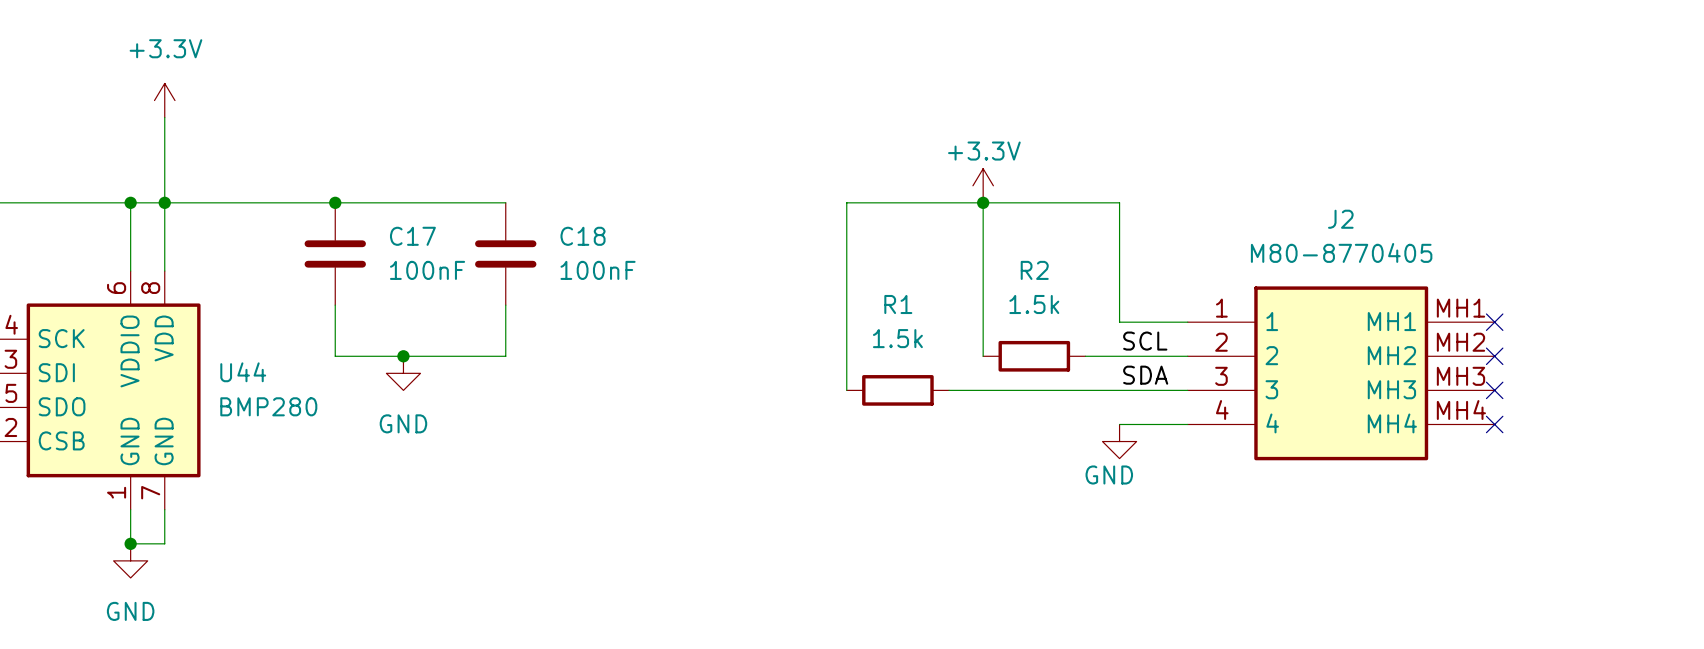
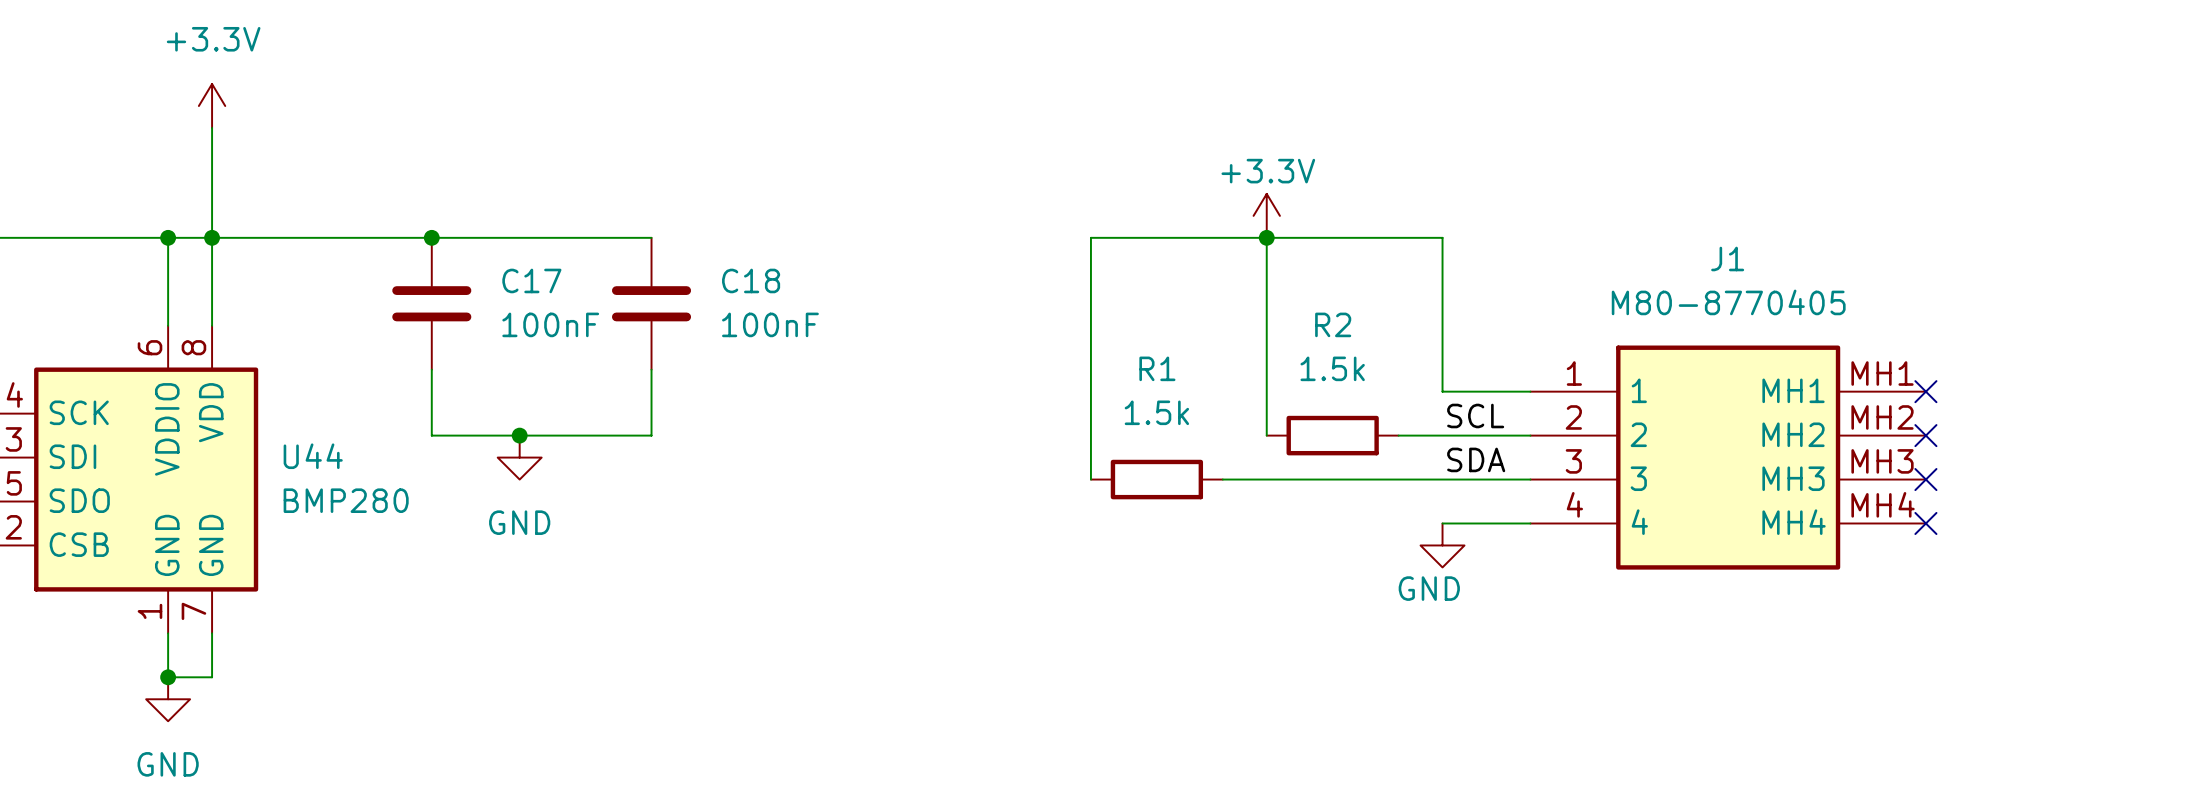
J2 name: J2 (1340, 219) -> J1 (1727, 258)

